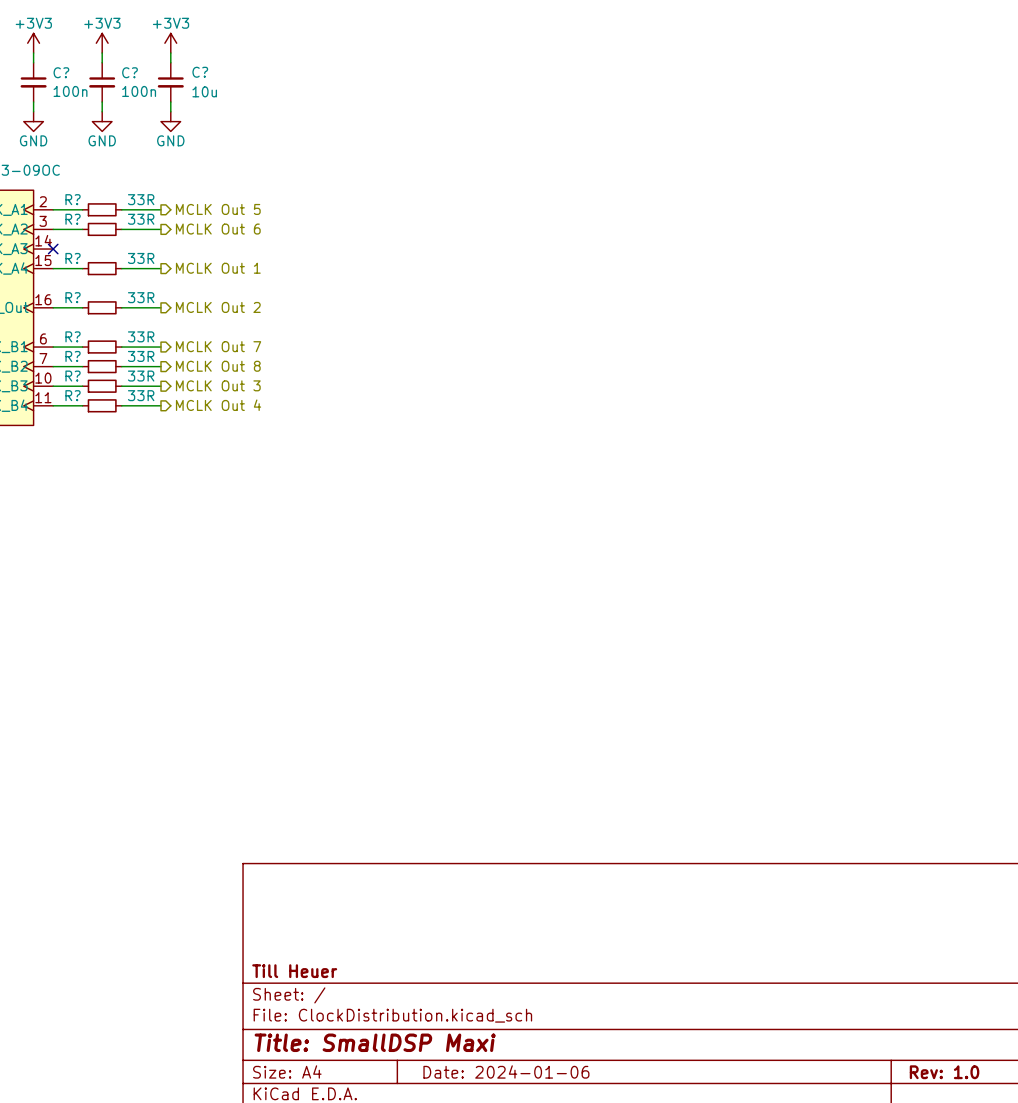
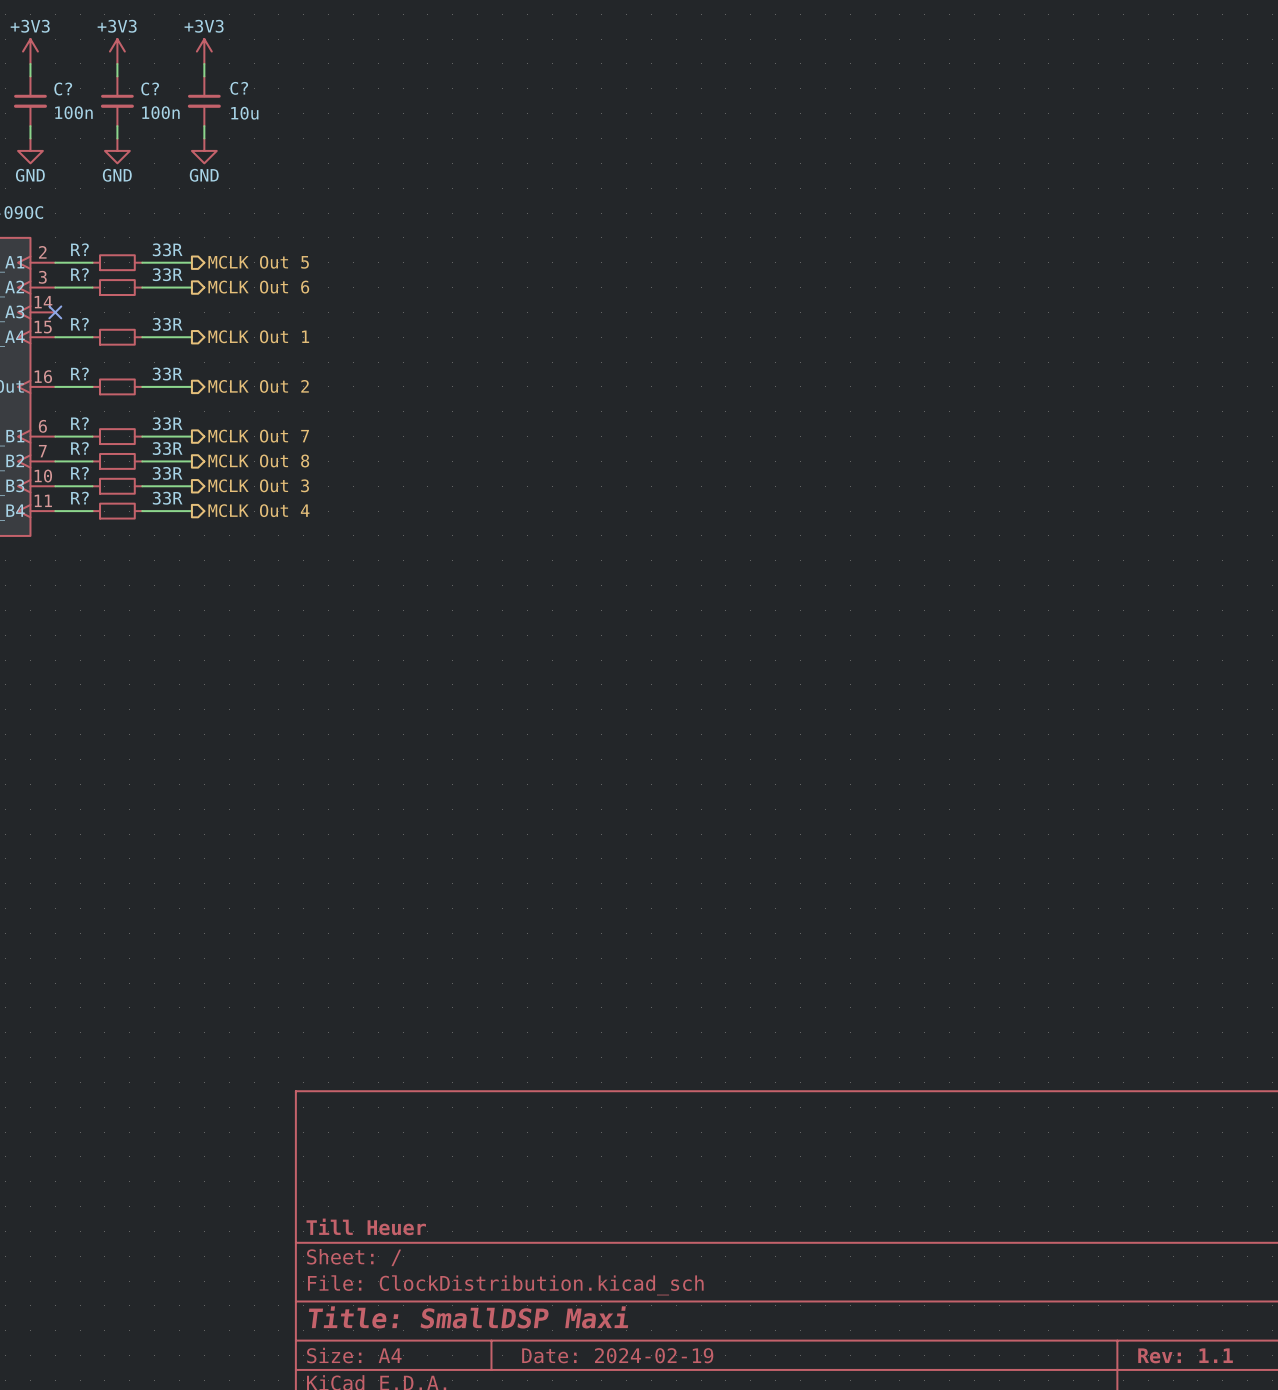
title block: Date: 2024-01-06 (506, 1071) -> Date: 2024-02-19 (617, 1355)
title block: Rev: 1.0 (944, 1072) -> Rev: 1.1 (1185, 1355)

